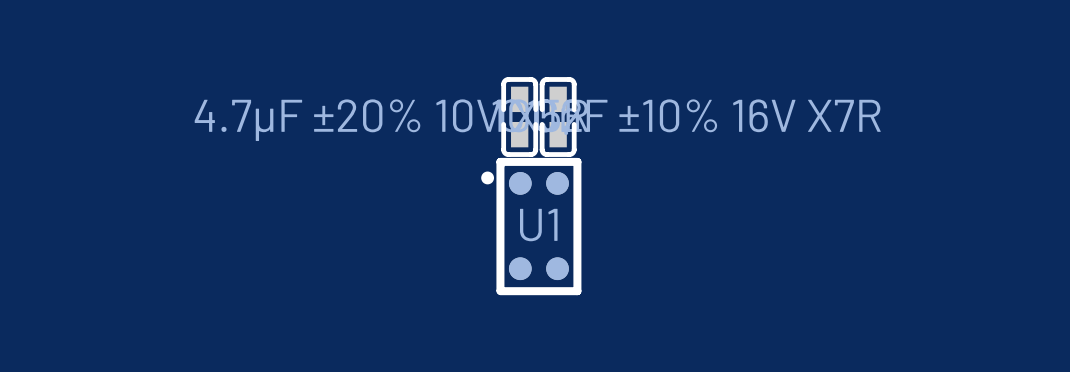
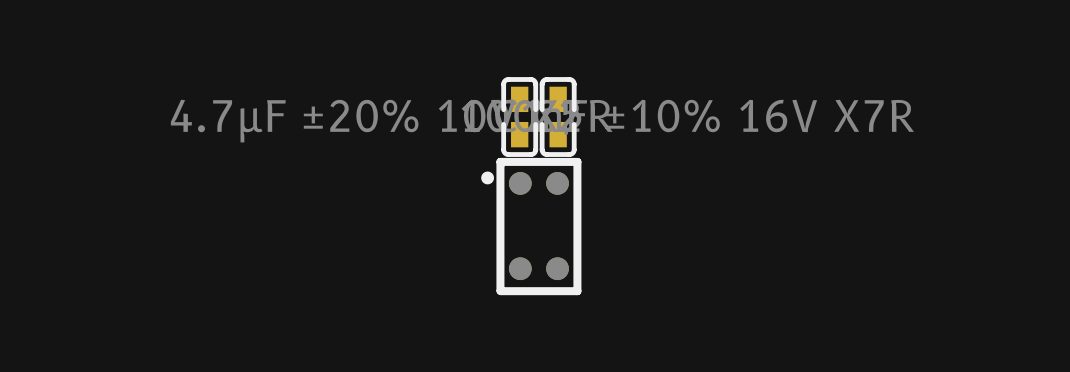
U1 name: U1 (538, 225) -> none

